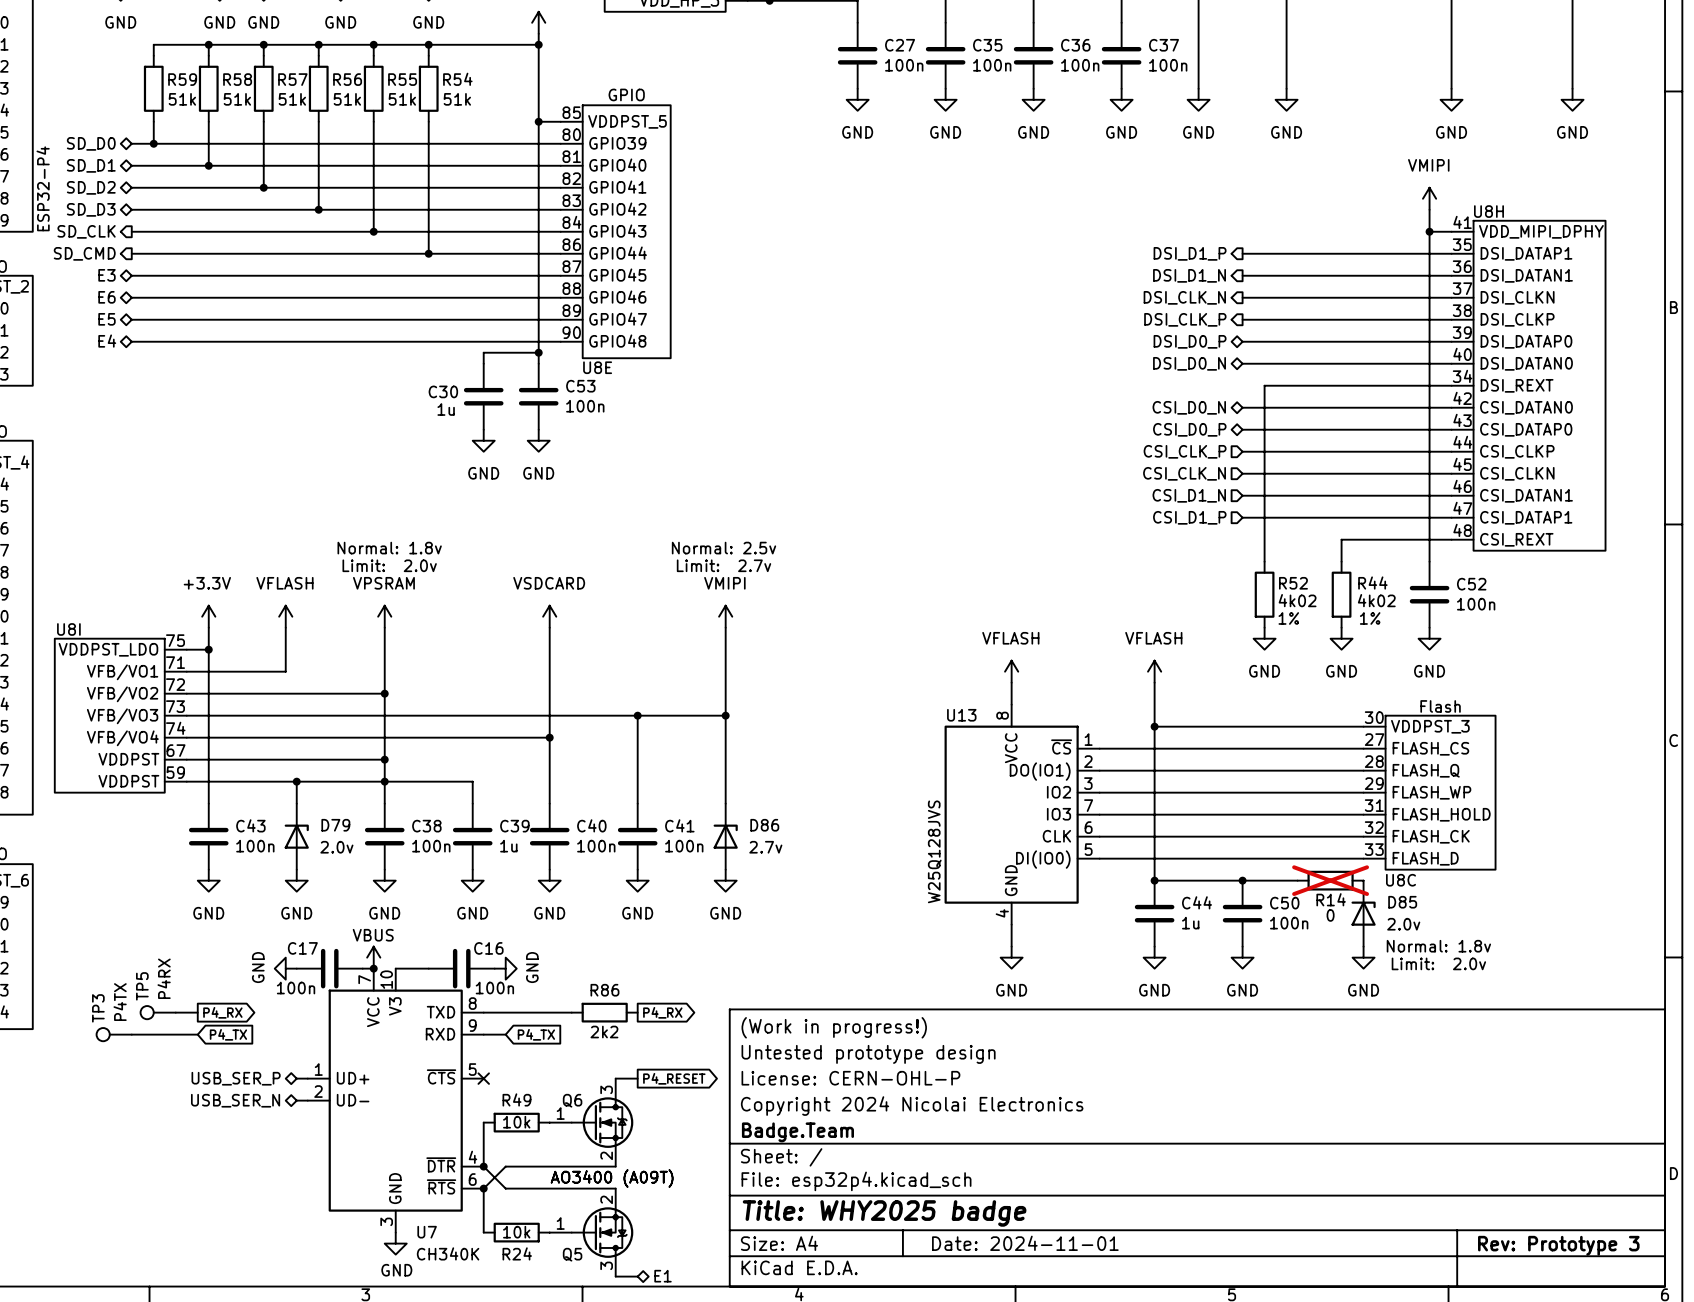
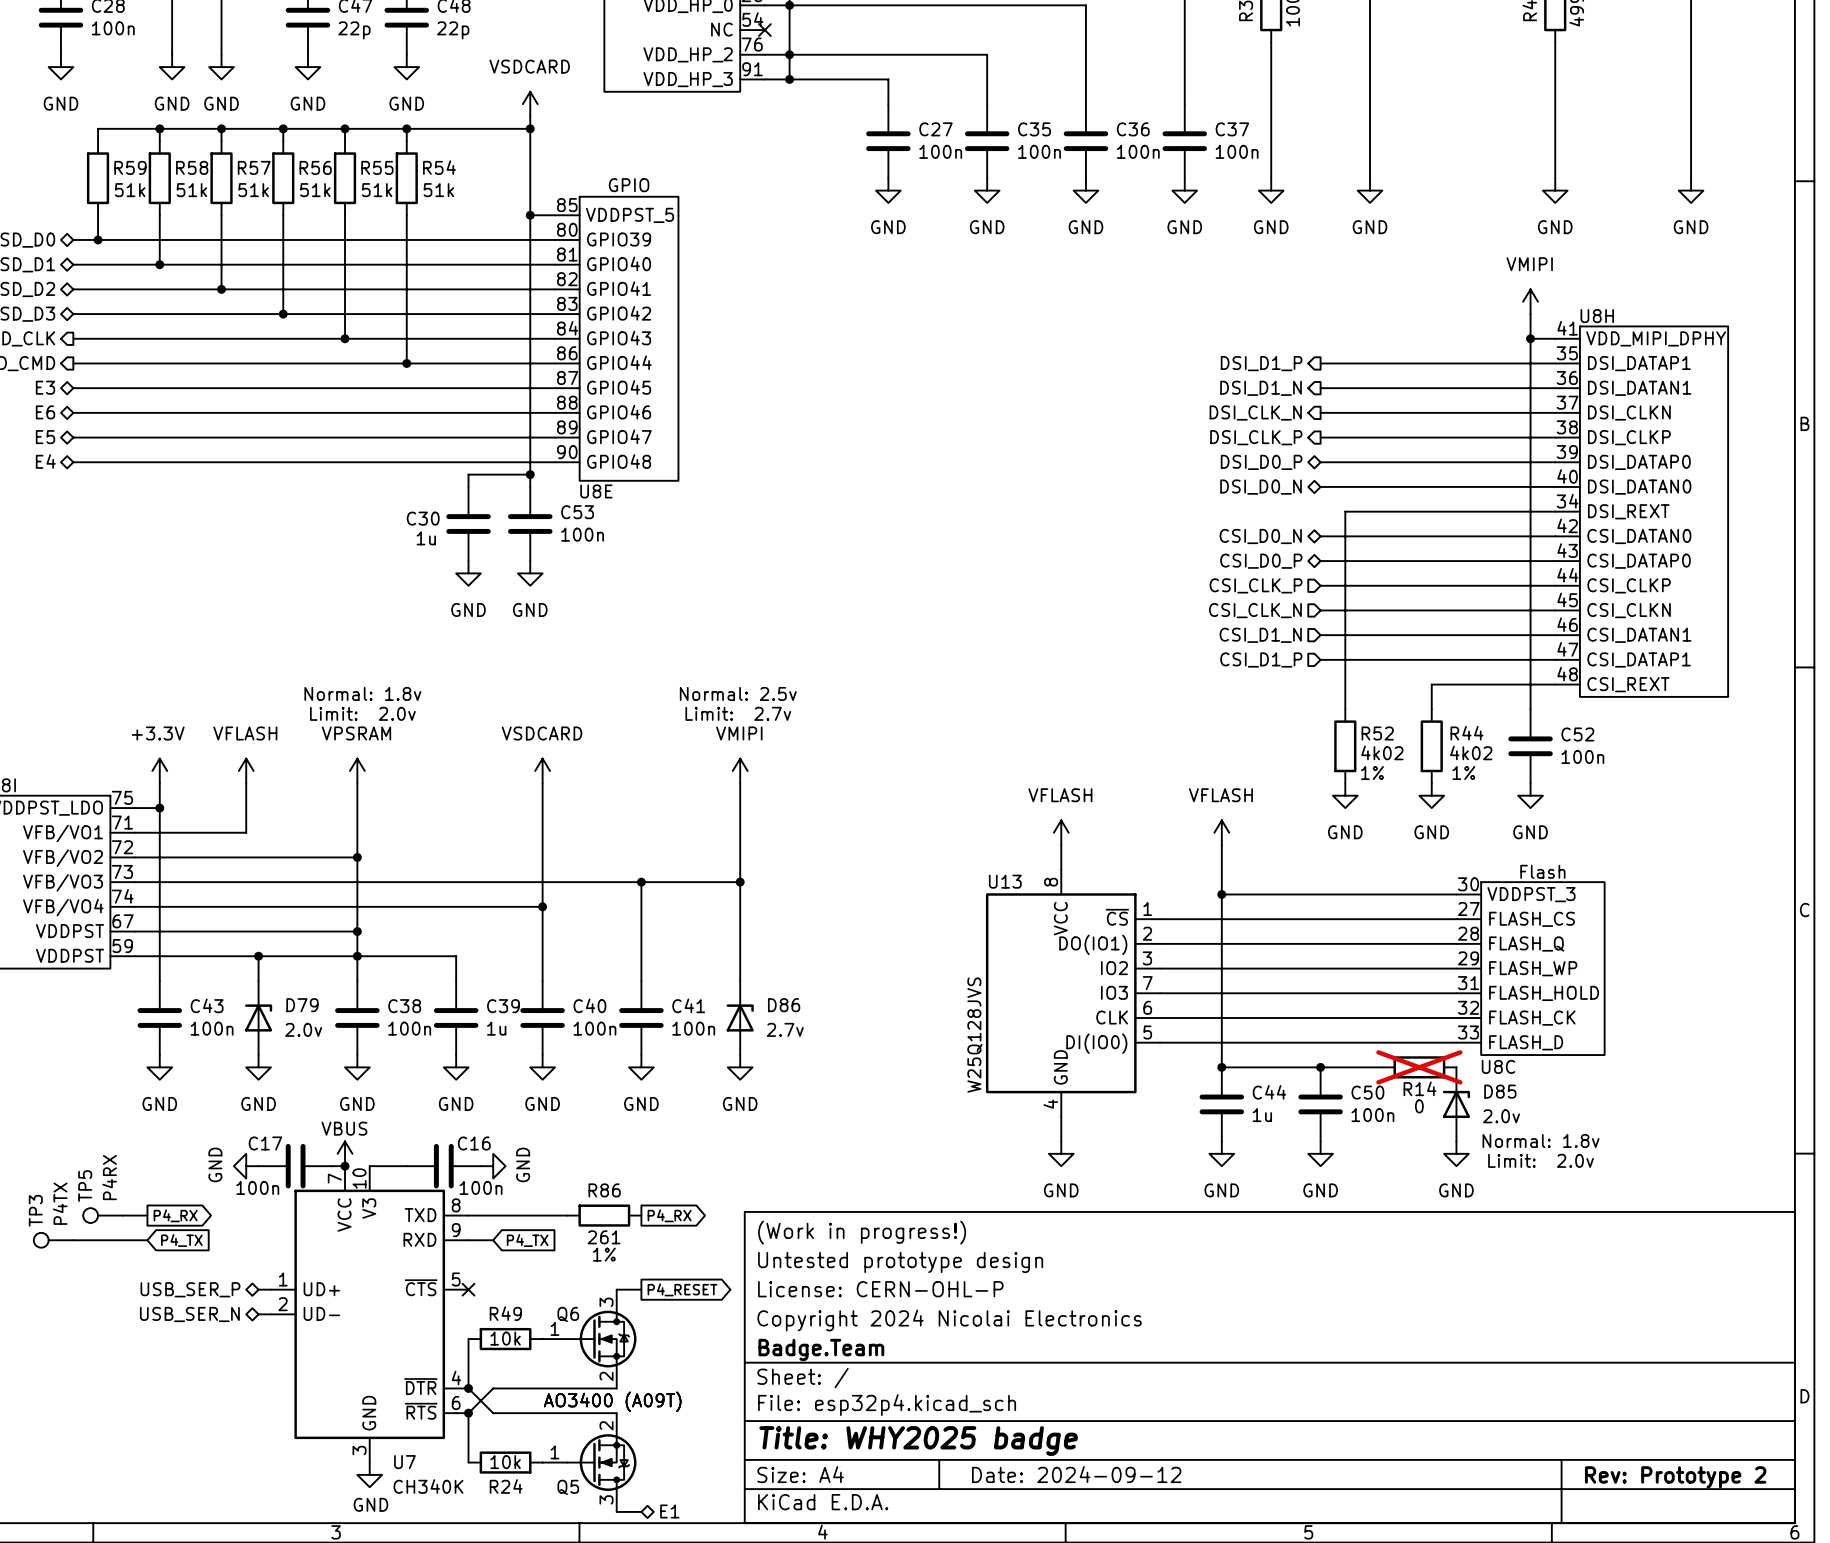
R86 value: 2k2 (604, 1032) -> 261 (604, 1237)
R86 text: none -> 1% (604, 1254)
title block: Date: 2024-11-01 (1025, 1243) -> Date: 2024-09-12 (1076, 1474)
title block: Rev: Prototype 3 (1558, 1245) -> Rev: Prototype 2 (1675, 1477)

